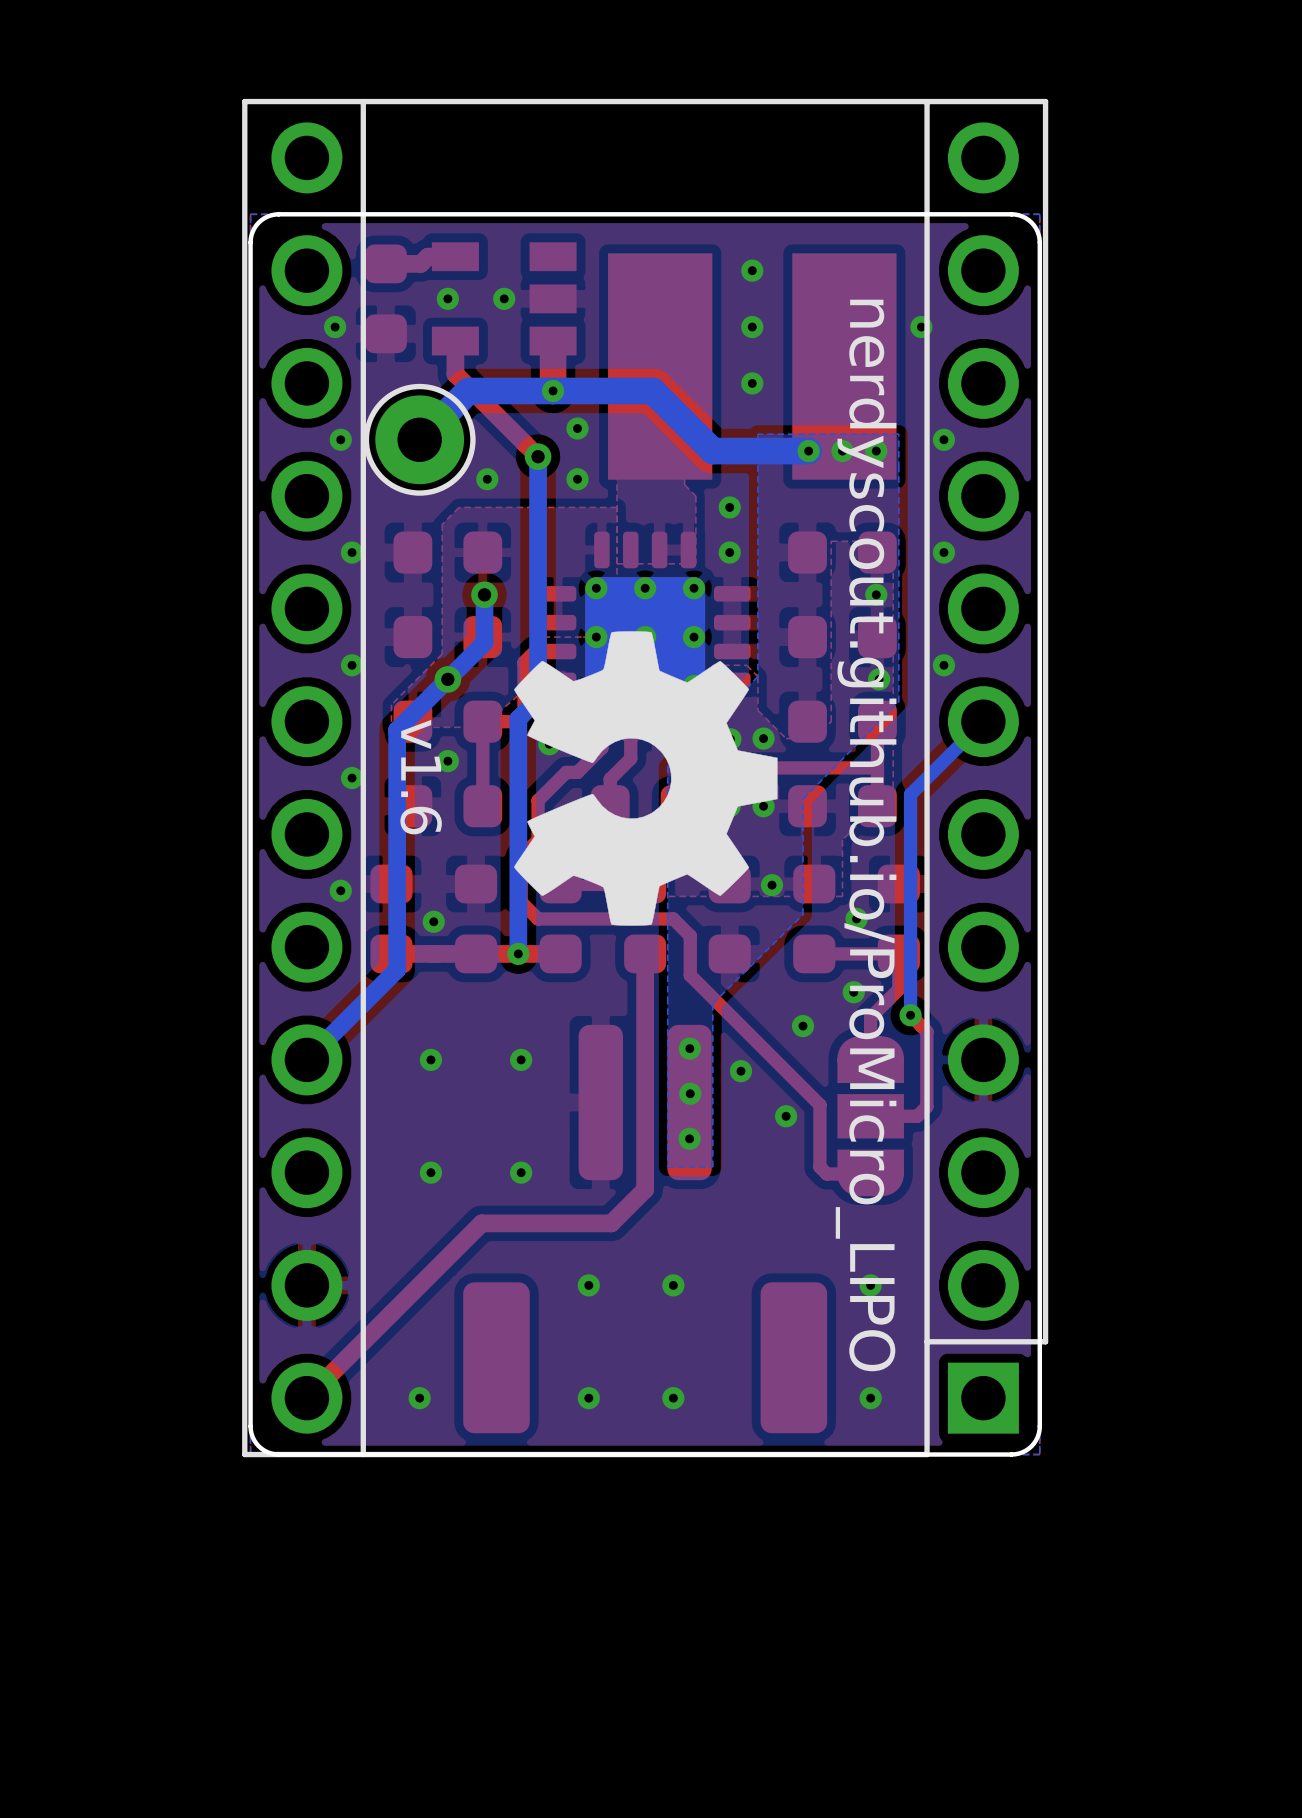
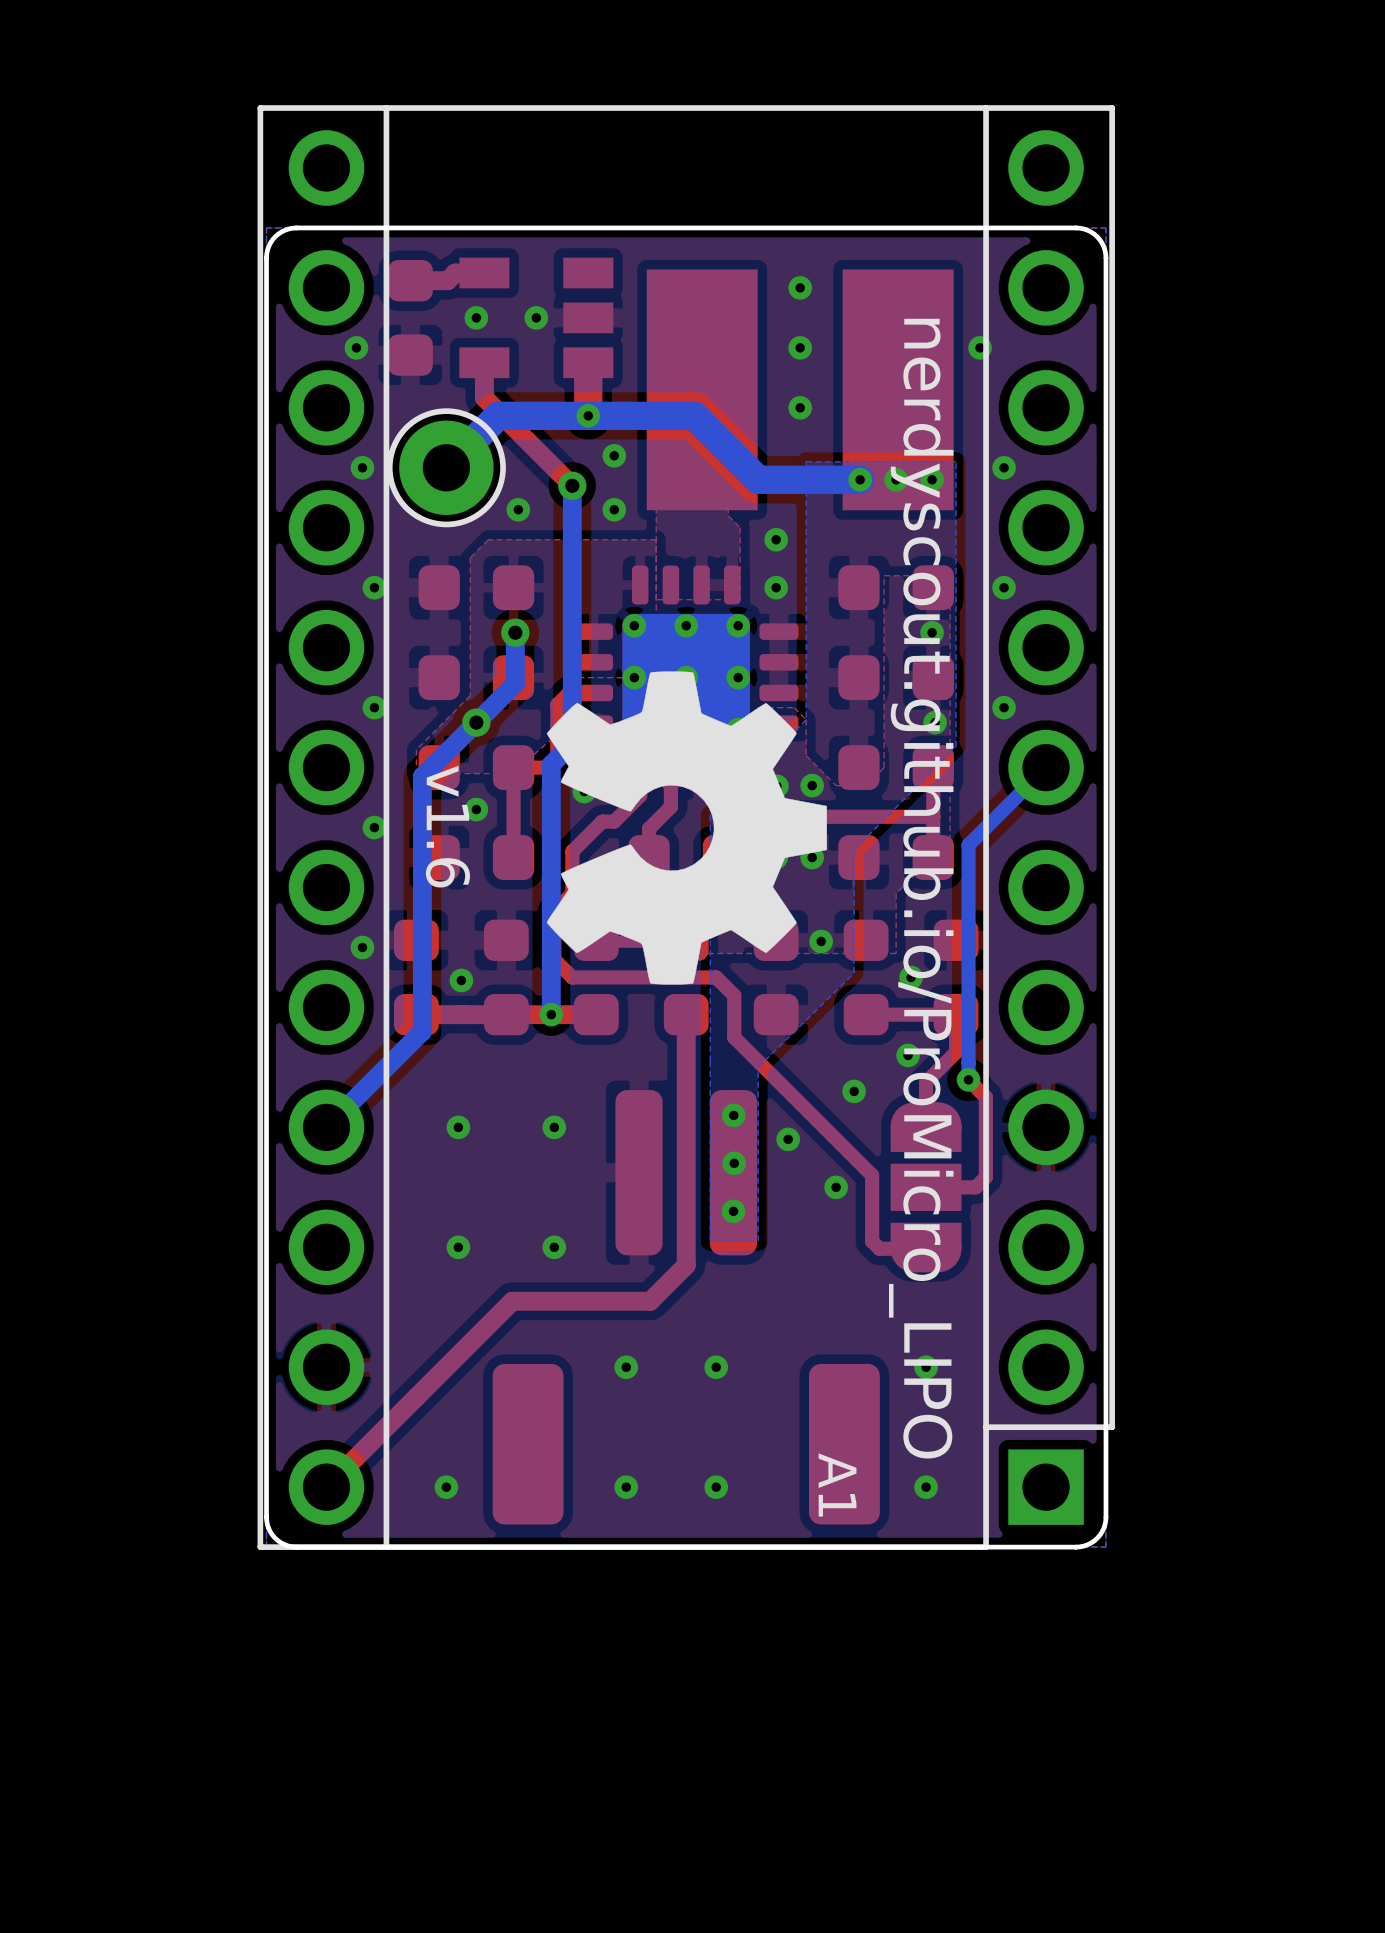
A1 name: none -> A1 (837, 1484)

